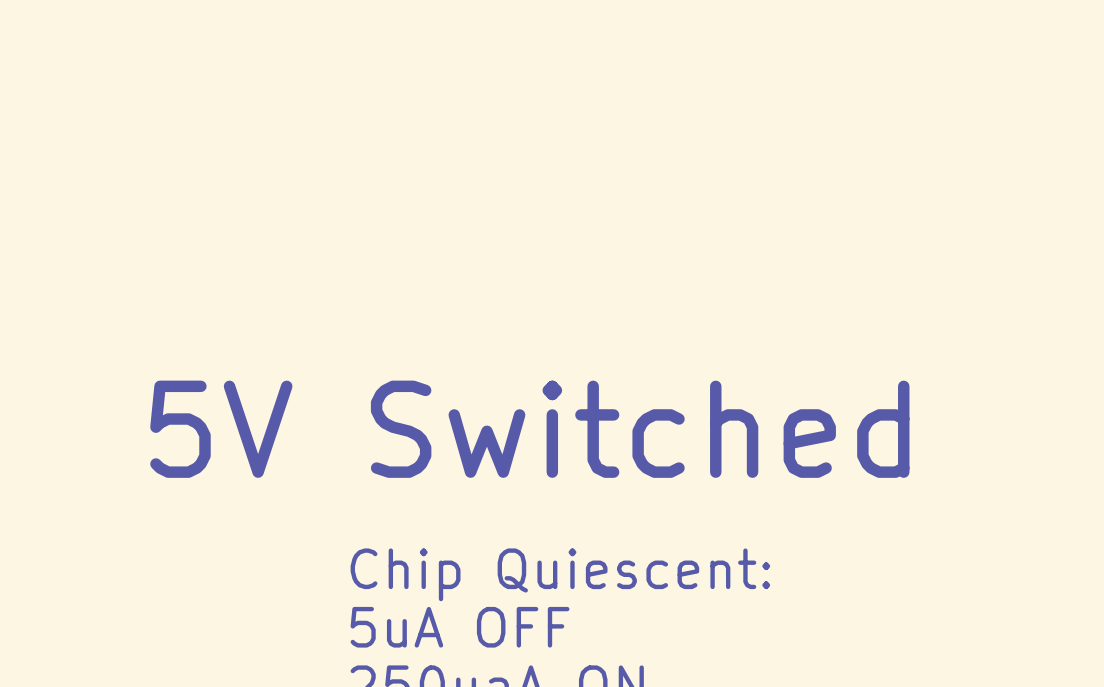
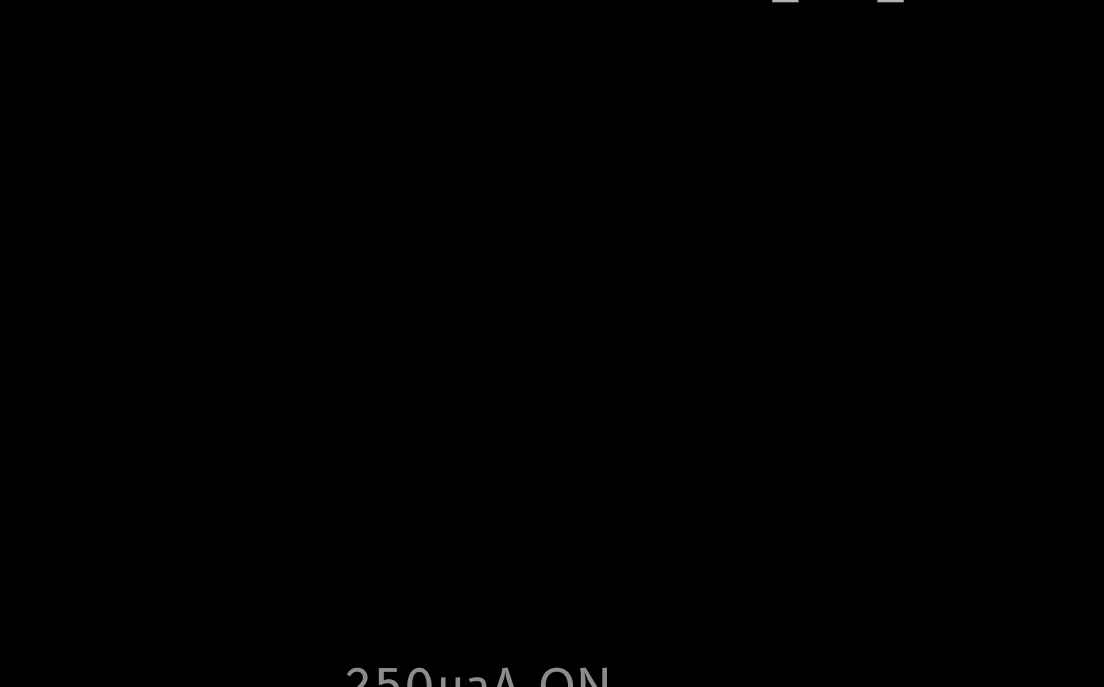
text: 5V Switched (529, 429) -> none
text: Chip Quiescent: (560, 574) -> none
text: 5uA OFF (460, 627) -> none

